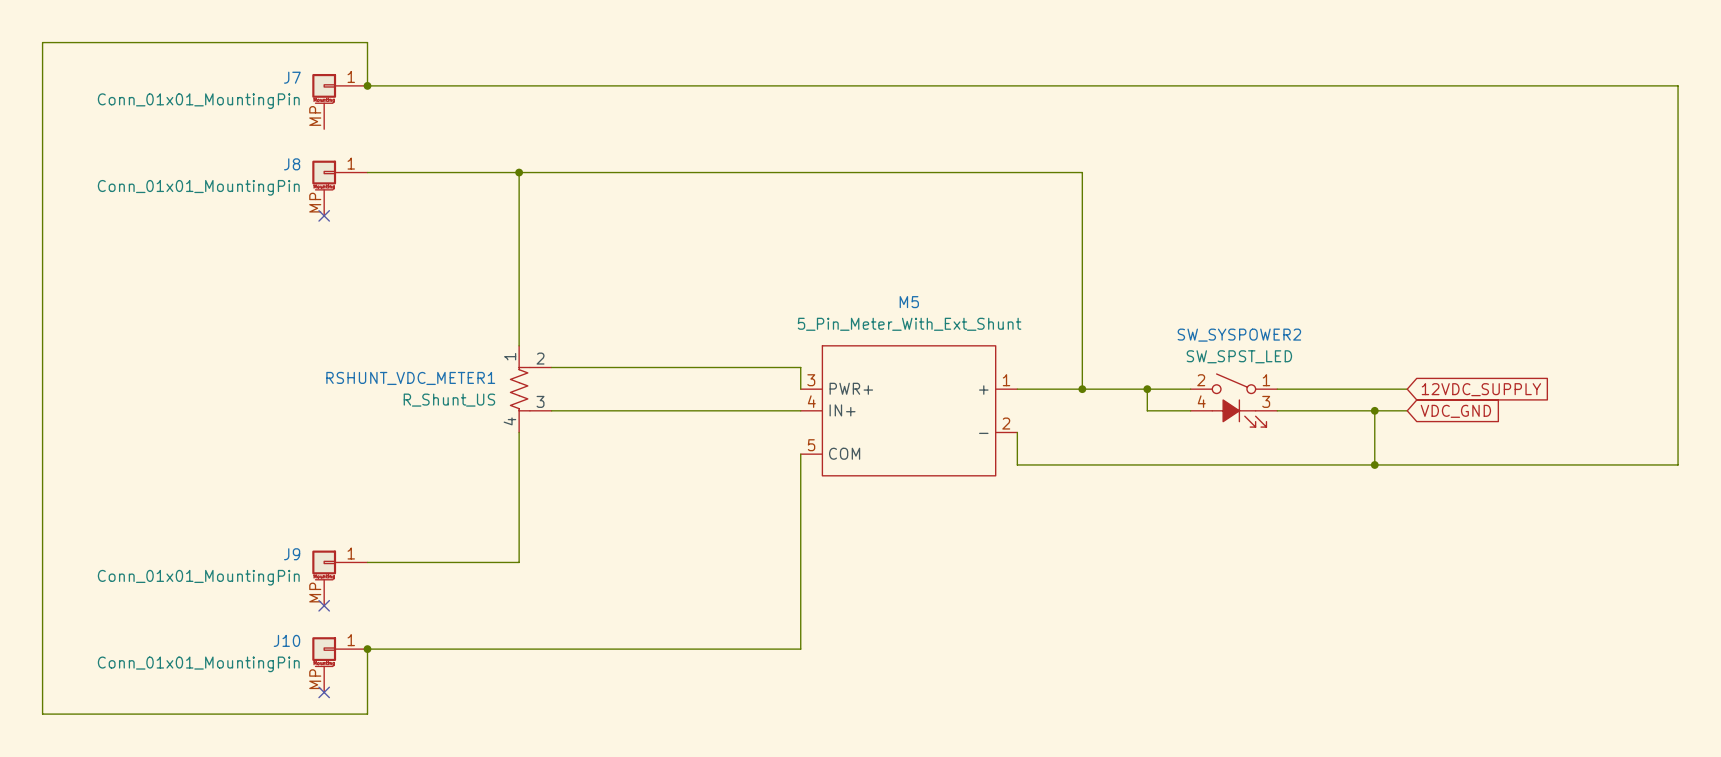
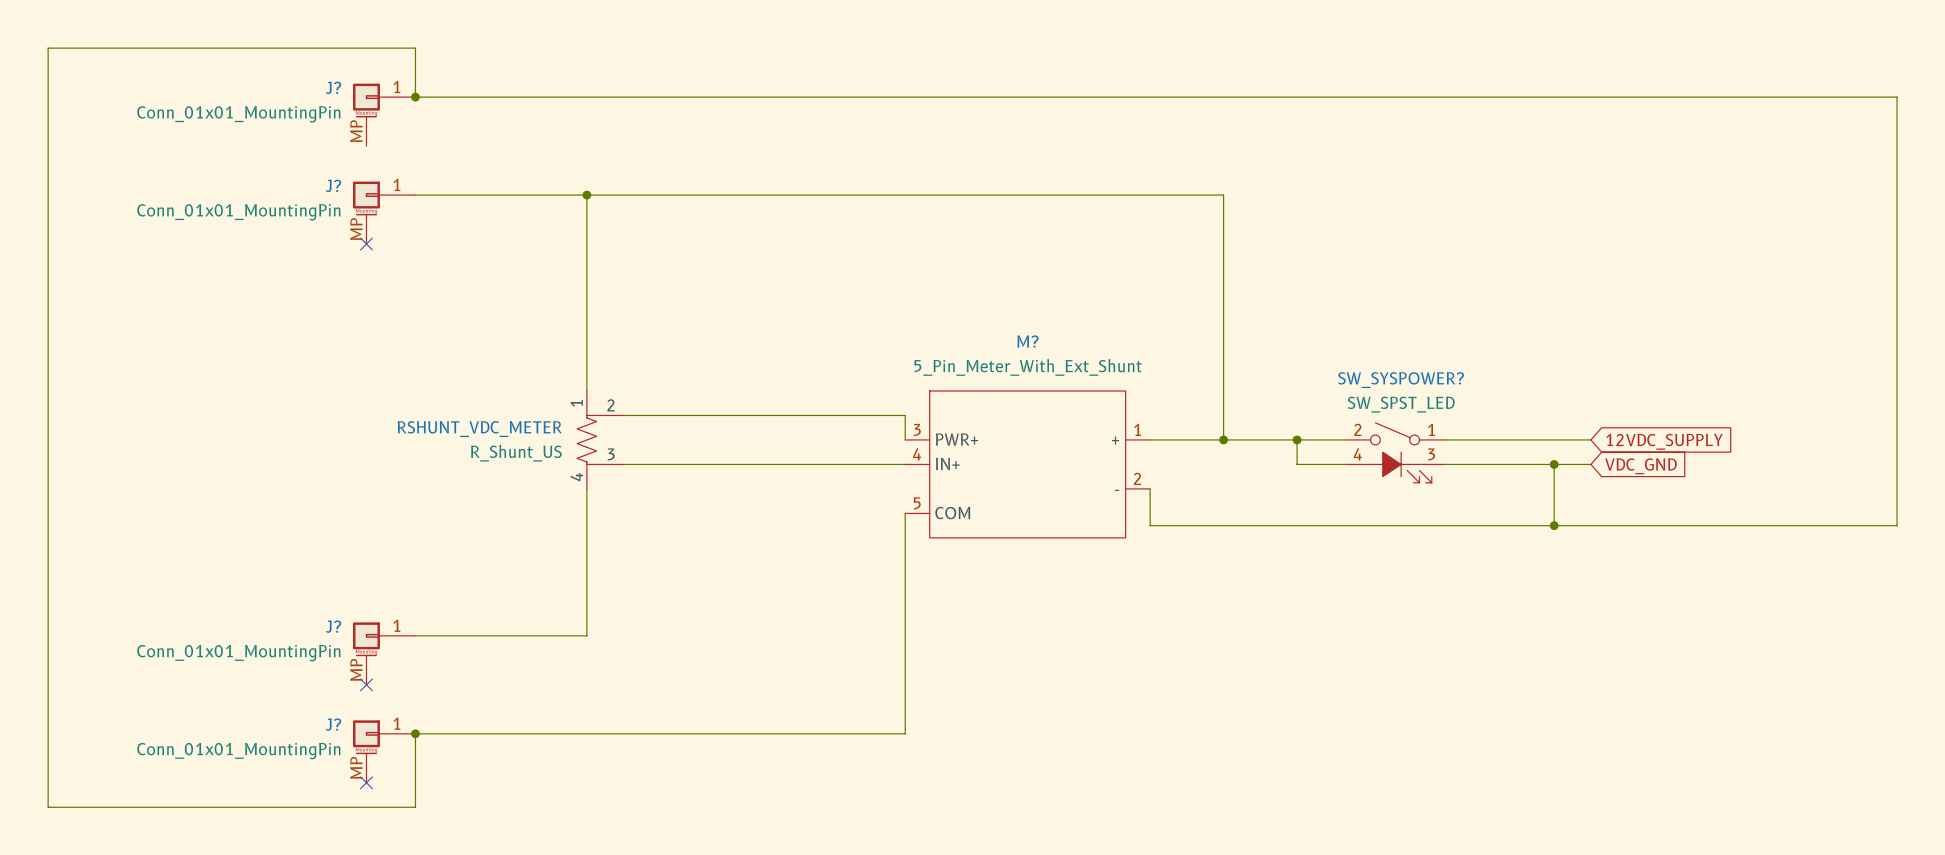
J7 name: J7 (292, 77) -> J? (333, 87)
J8 name: J8 (292, 164) -> J? (333, 185)
M5 name: M5 (909, 302) -> M? (1027, 341)
SW_SYSPOWER2 name: SW_SYSPOWER2 (1239, 335) -> SW_SYSPOWER? (1401, 380)
RSHUNT_VDC_METER1 name: RSHUNT_VDC_METER1 (410, 378) -> RSHUNT_VDC_METER (479, 429)
J9 name: J9 (292, 554) -> J? (333, 626)
J10 name: J10 (286, 640) -> J? (333, 724)

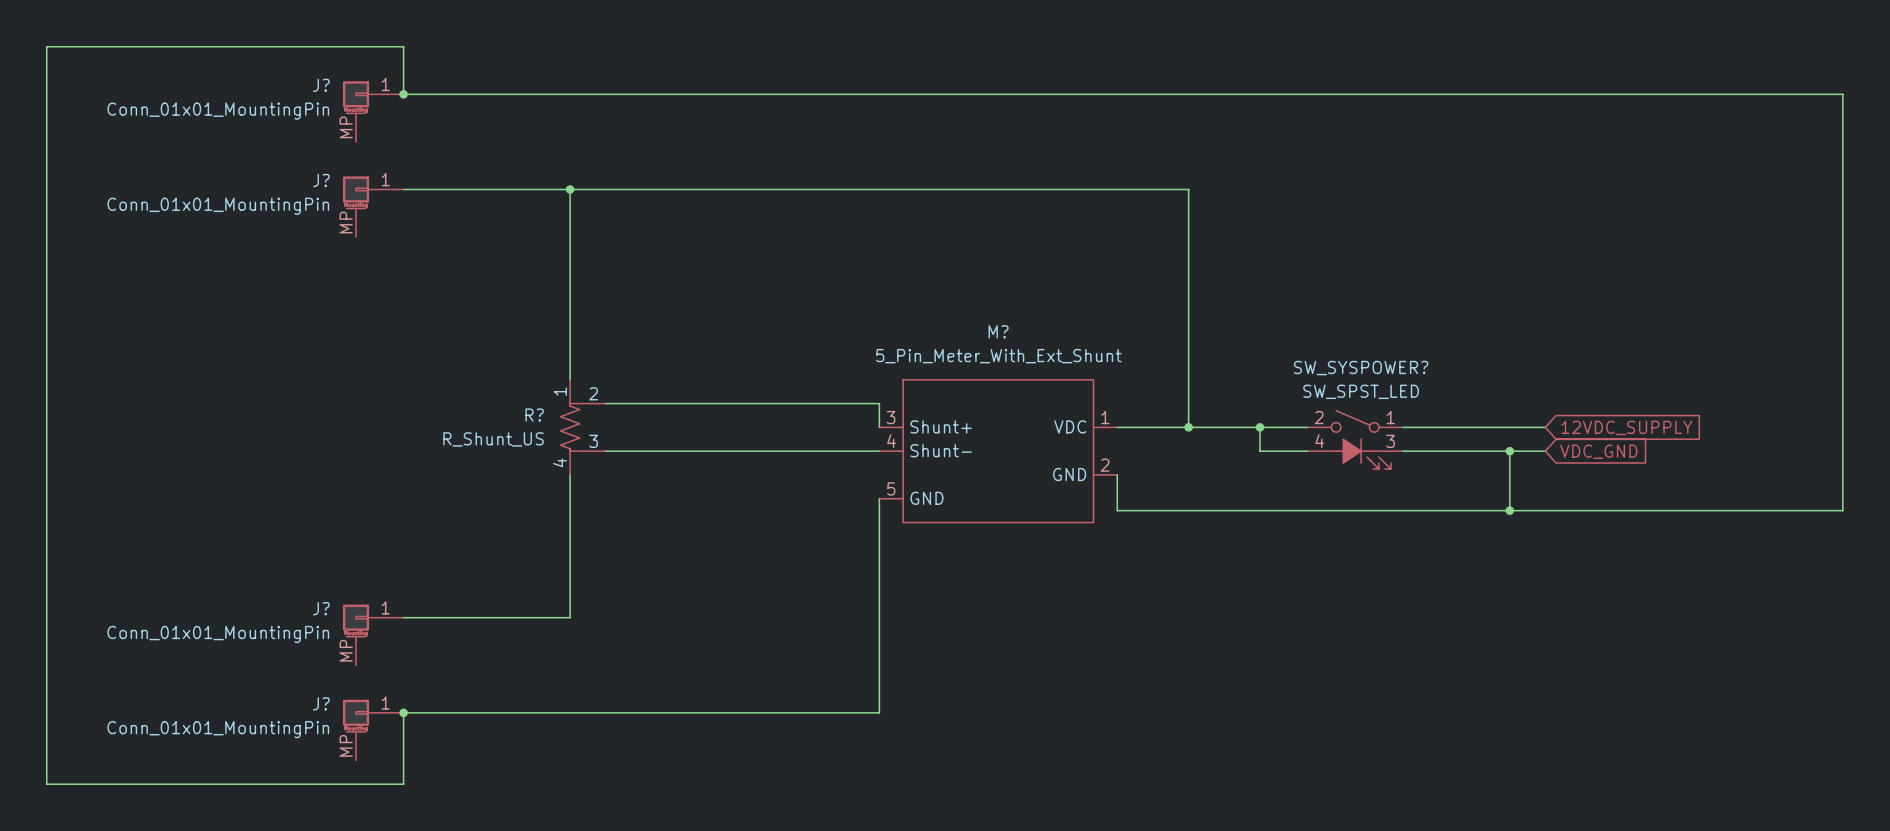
no-connect mark: (366, 244) -> none
RSHUNT_VDC_METER name: RSHUNT_VDC_METER (479, 429) -> R? (534, 415)
M? pin name: PWR+ (957, 439) -> Shunt+ (941, 426)
M? pin name: + (1115, 440) -> VDC (1070, 426)
M? pin name: IN+ (947, 463) -> Shunt- (941, 450)
M? pin name: - (1117, 490) -> GND (1069, 474)
M? pin name: COM (952, 513) -> GND (926, 498)
no-connect mark: (366, 684) -> none
no-connect mark: (366, 782) -> none

